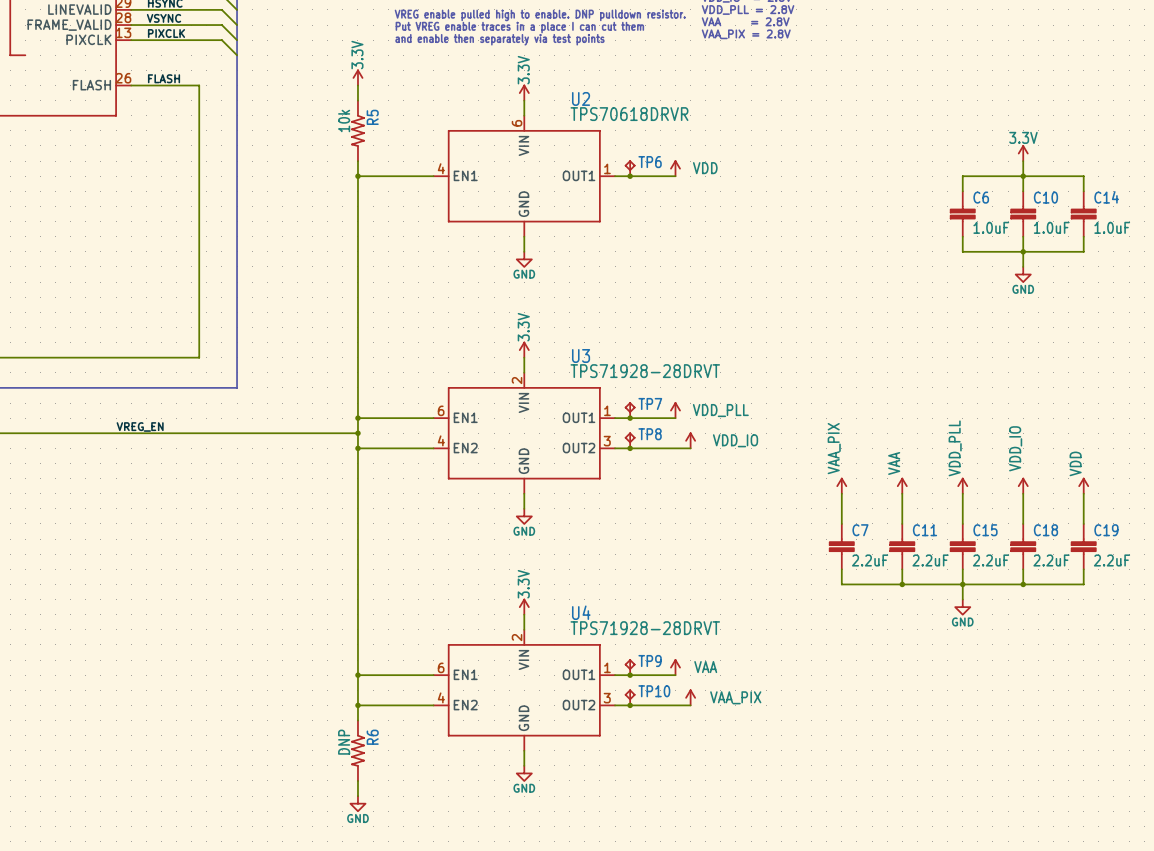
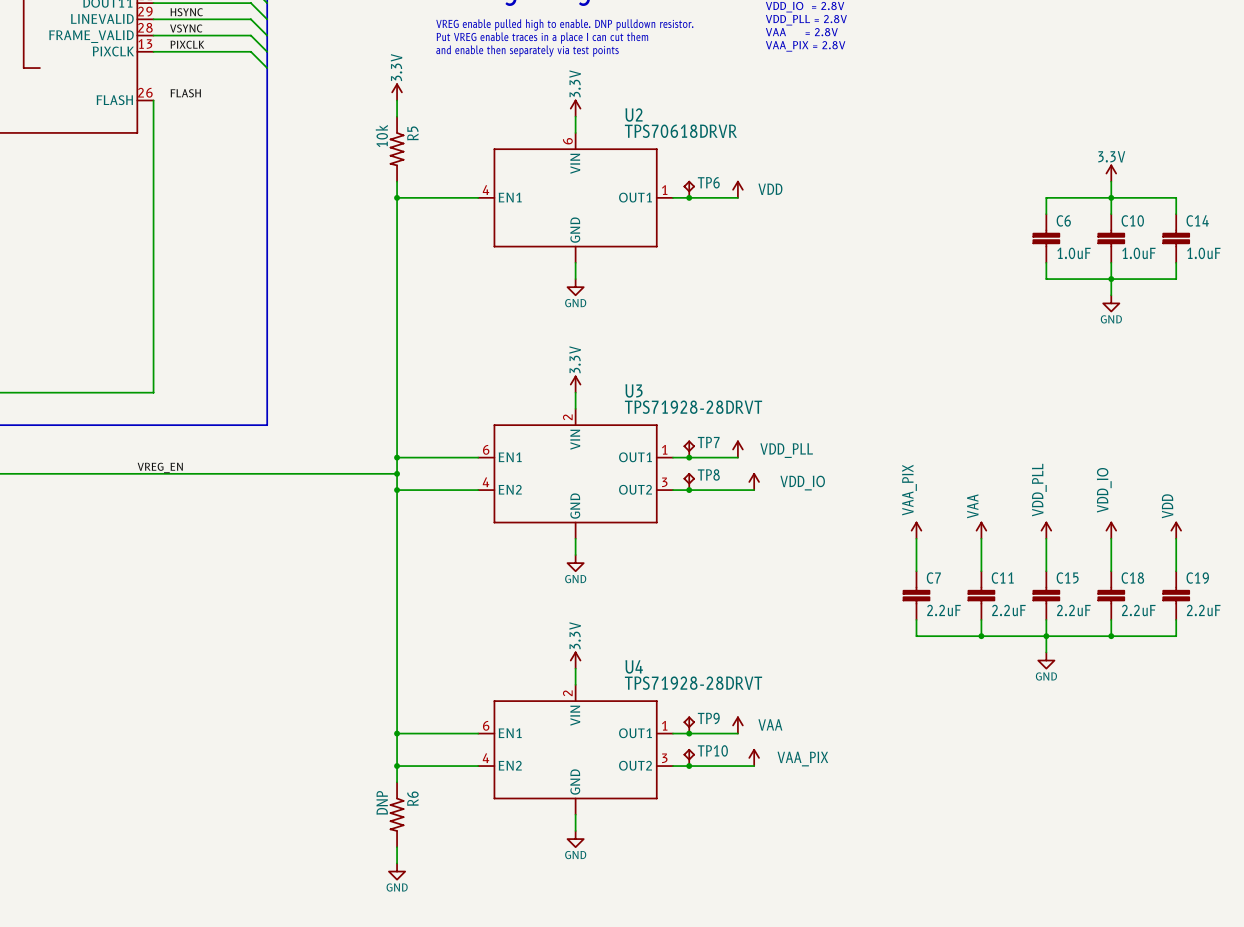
wire: (131, 85) (199, 85) (199, 357) (131, 357) -> (153, 100) (153, 392)

